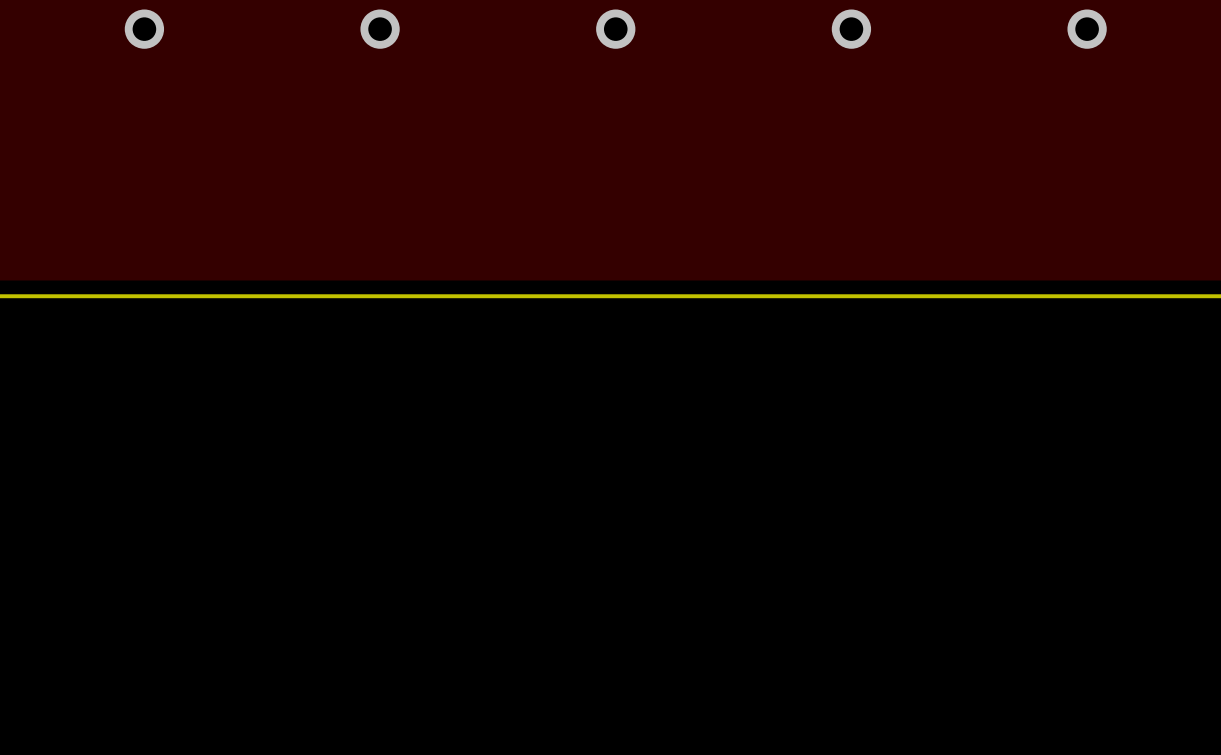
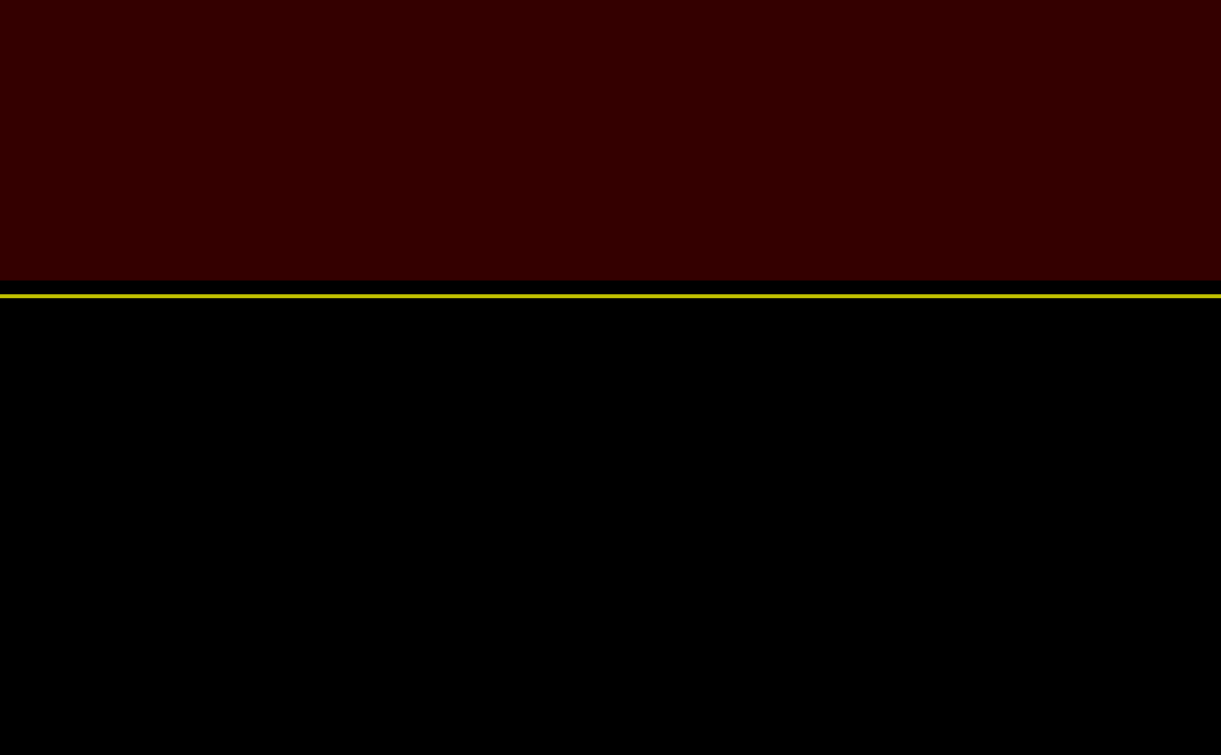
via: (144, 29) -> none
via: (380, 29) -> none
via: (615, 29) -> none
via: (851, 29) -> none
via: (1087, 29) -> none

